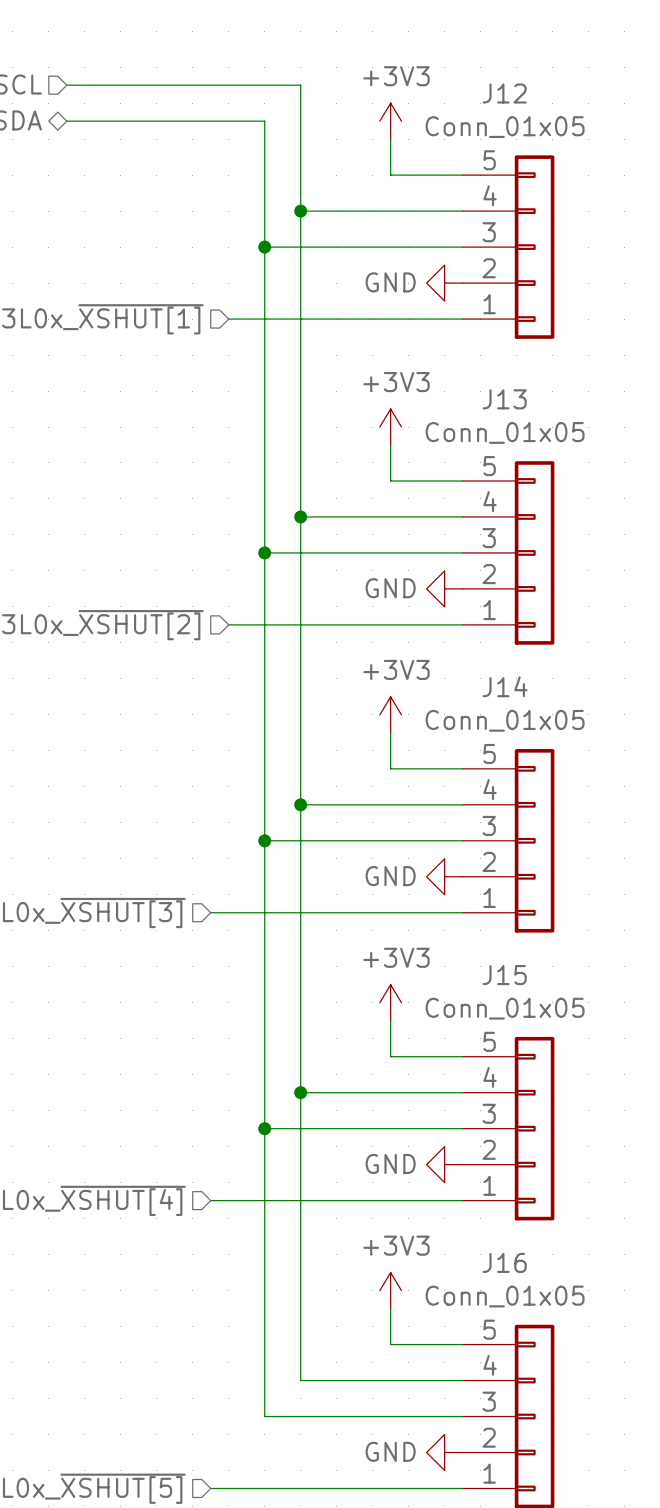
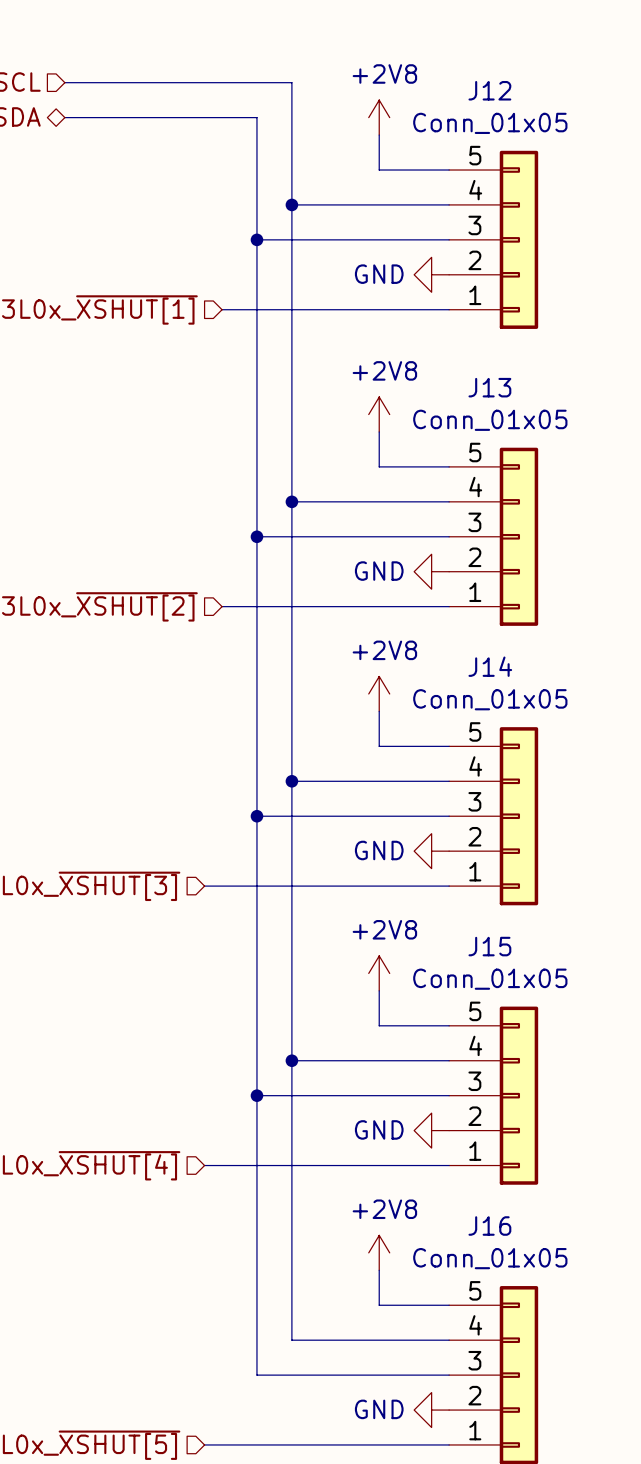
power symbol: +3V3 (390, 121) -> +2V8 (379, 117)
power symbol: +3V3 (390, 427) -> +2V8 (379, 414)
power symbol: +3V3 (390, 714) -> +2V8 (379, 693)
power symbol: +3V3 (390, 1002) -> +2V8 (379, 973)
power symbol: +3V3 (390, 1290) -> +2V8 (379, 1252)

